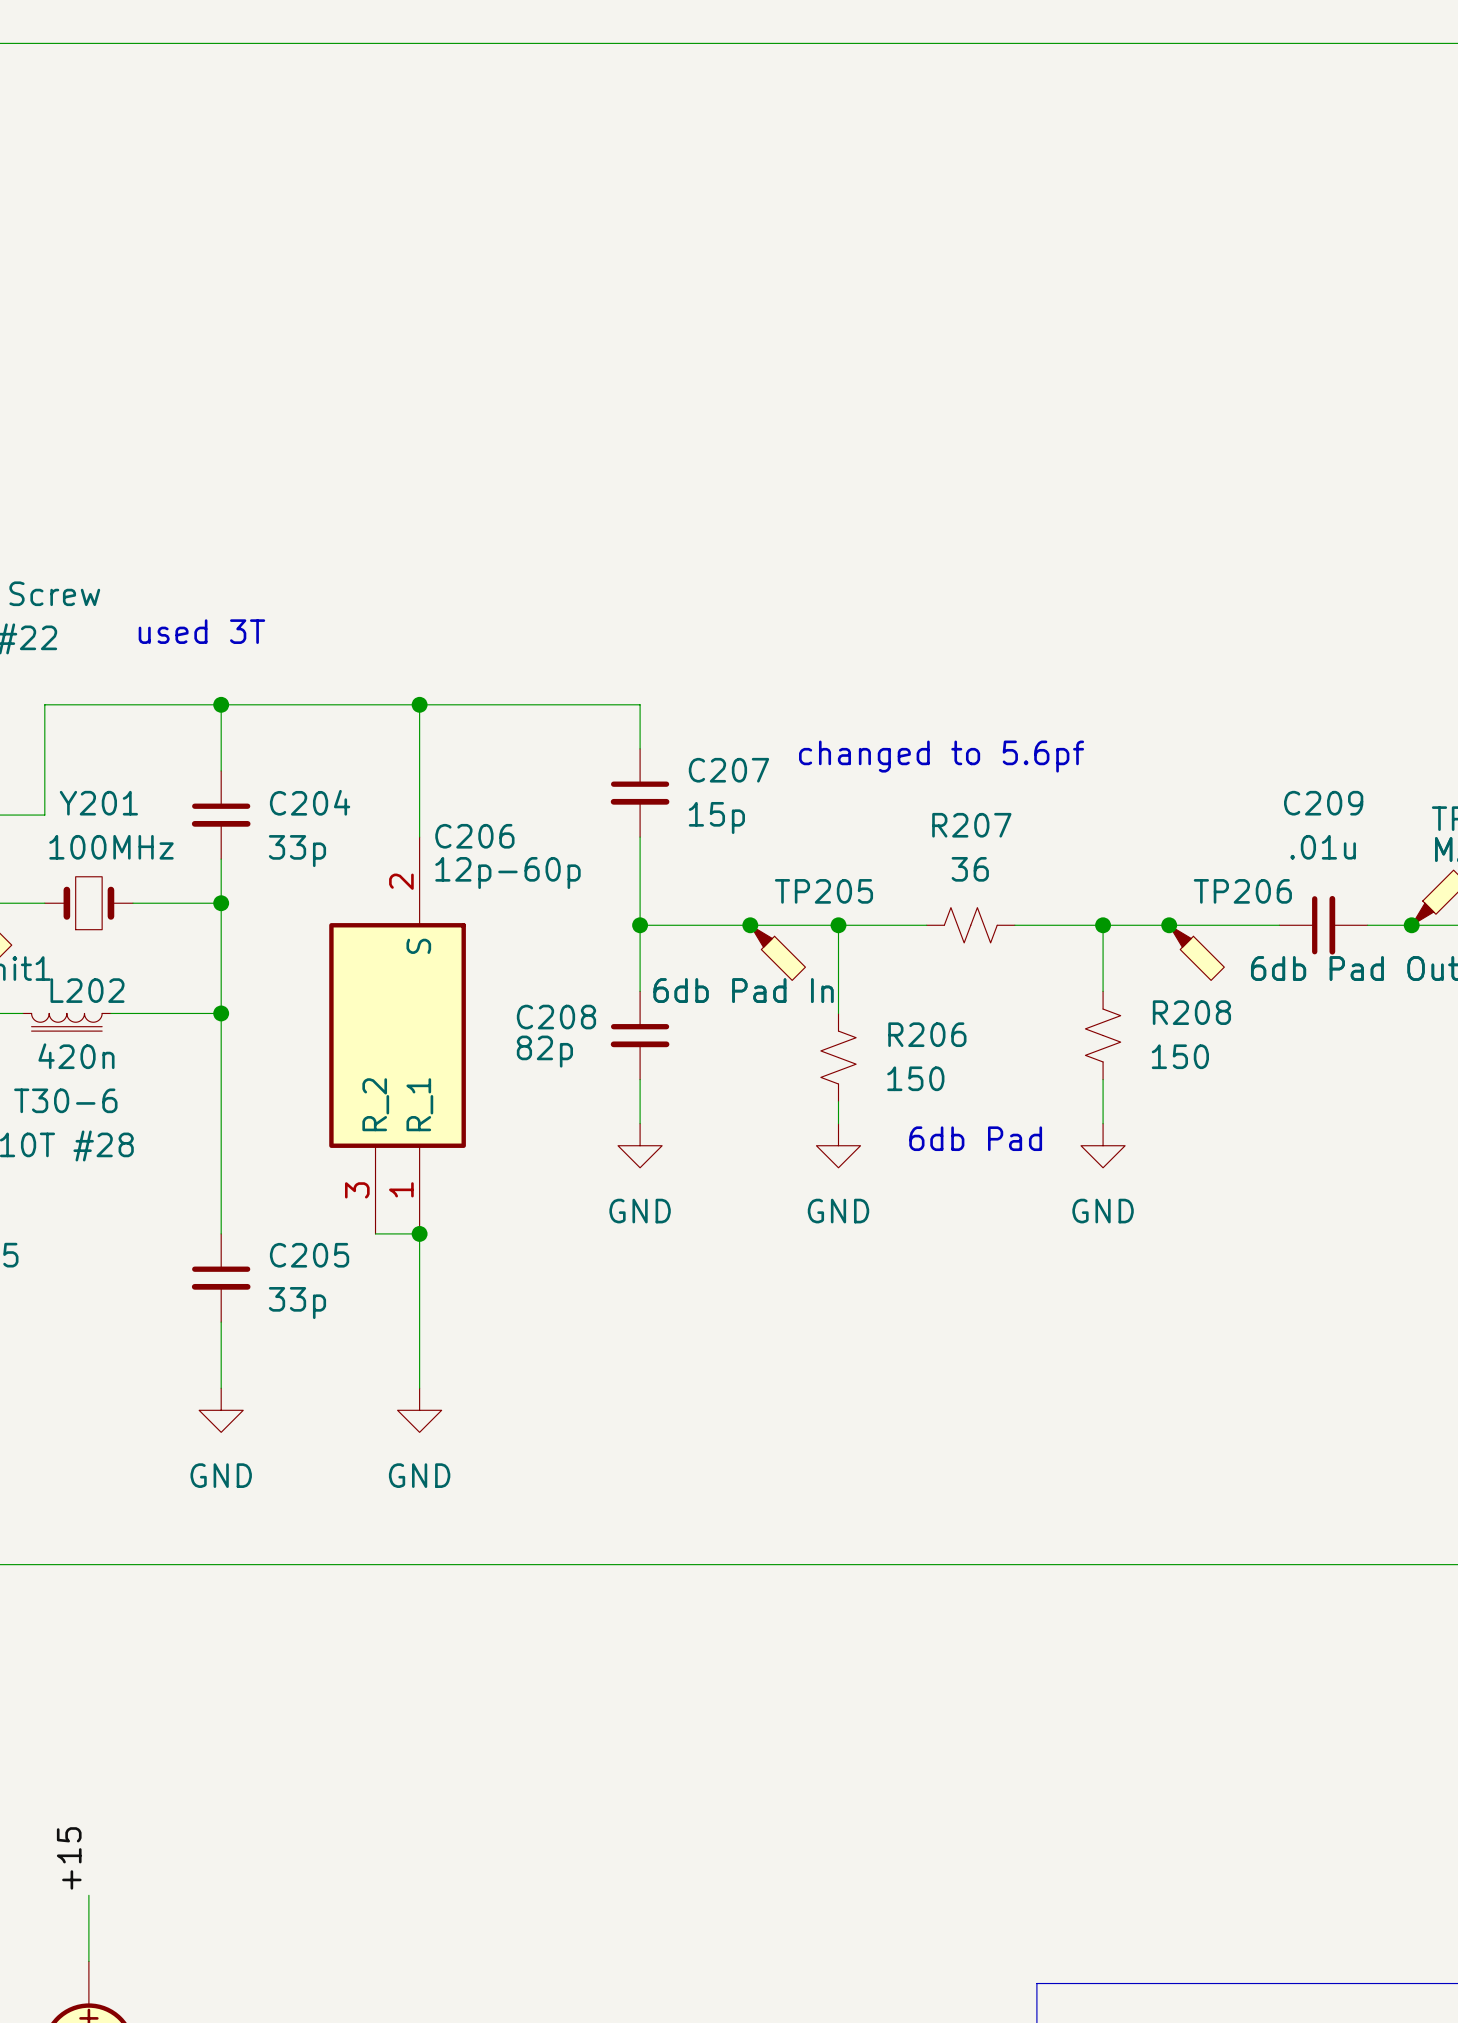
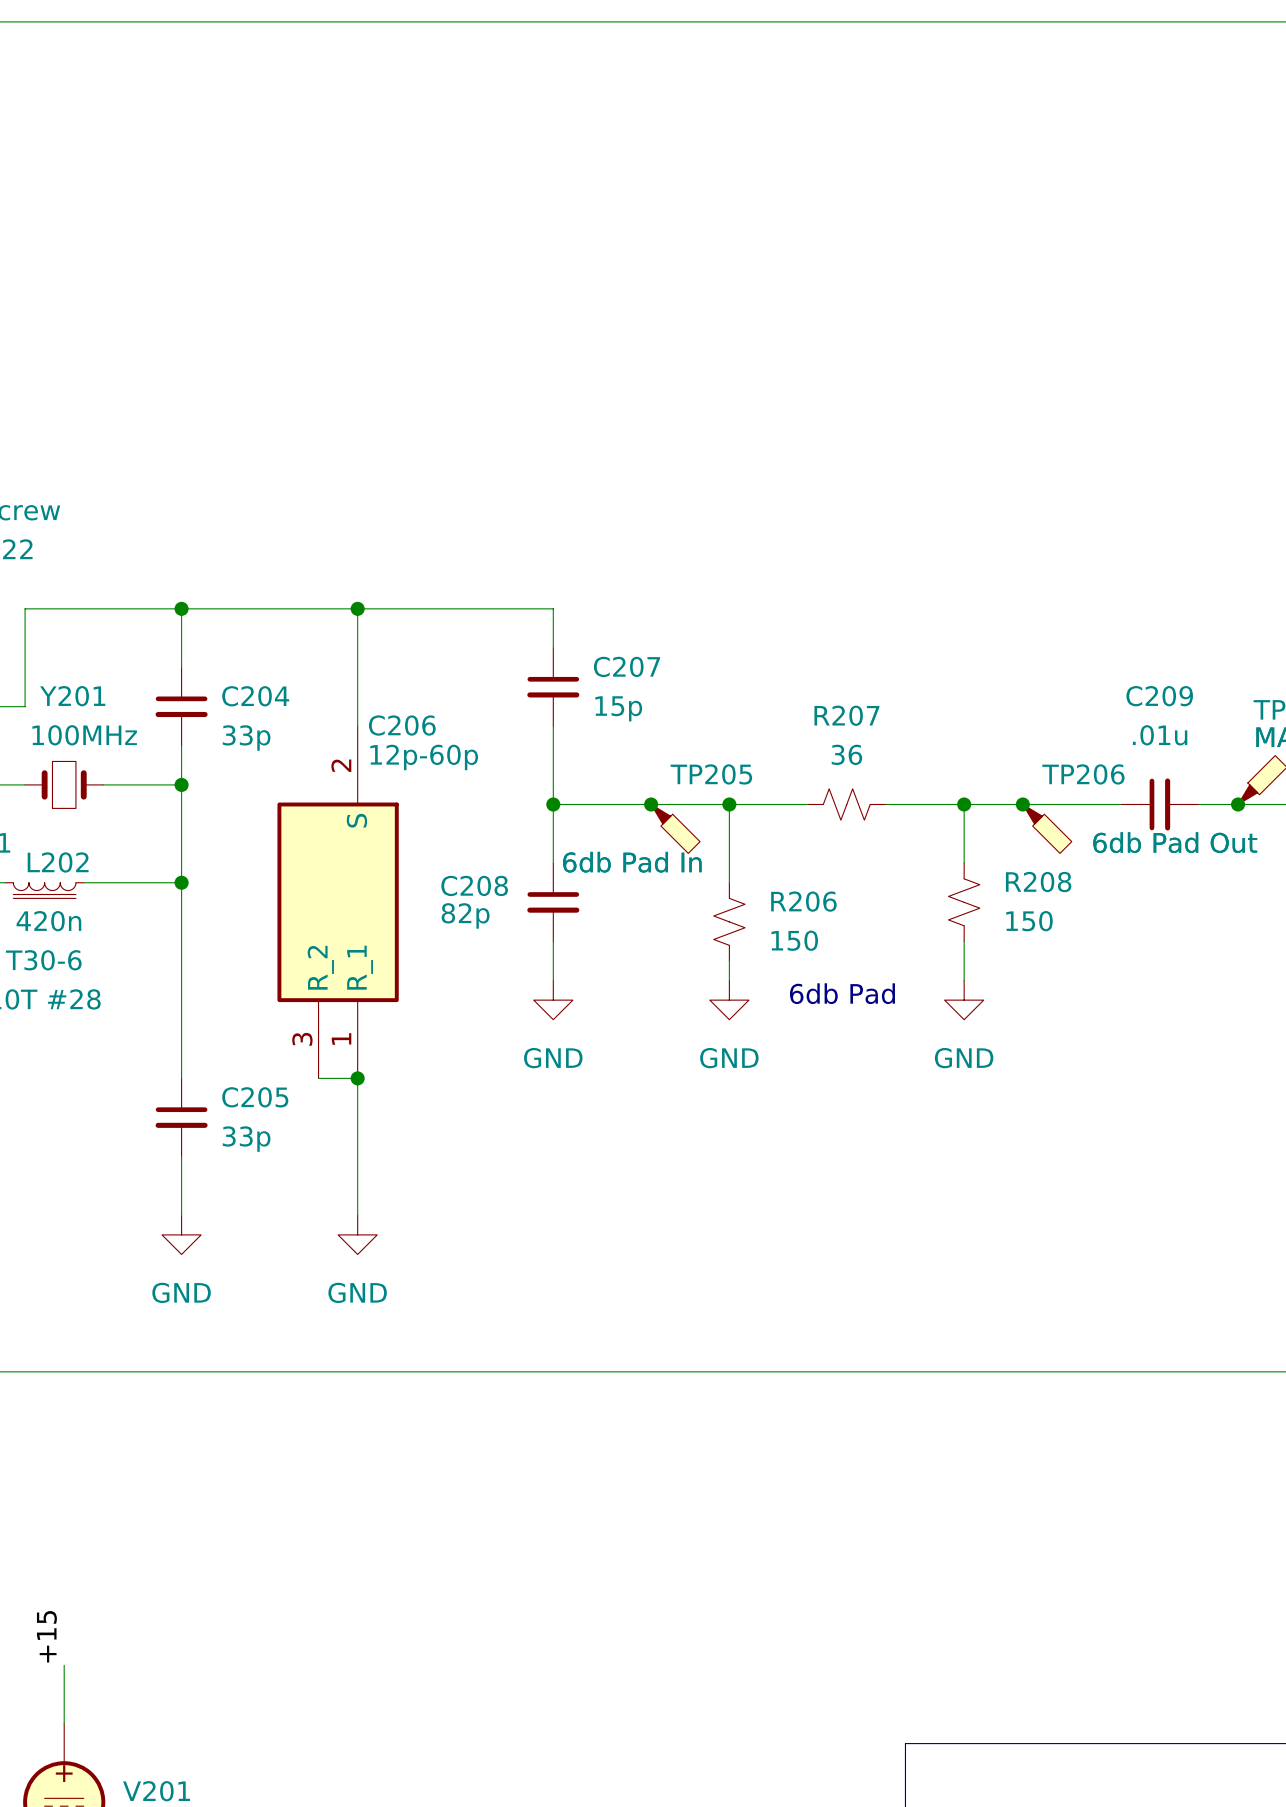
text: used 3T (201, 631) -> none
text: changed to 5.6pf (941, 756) -> none

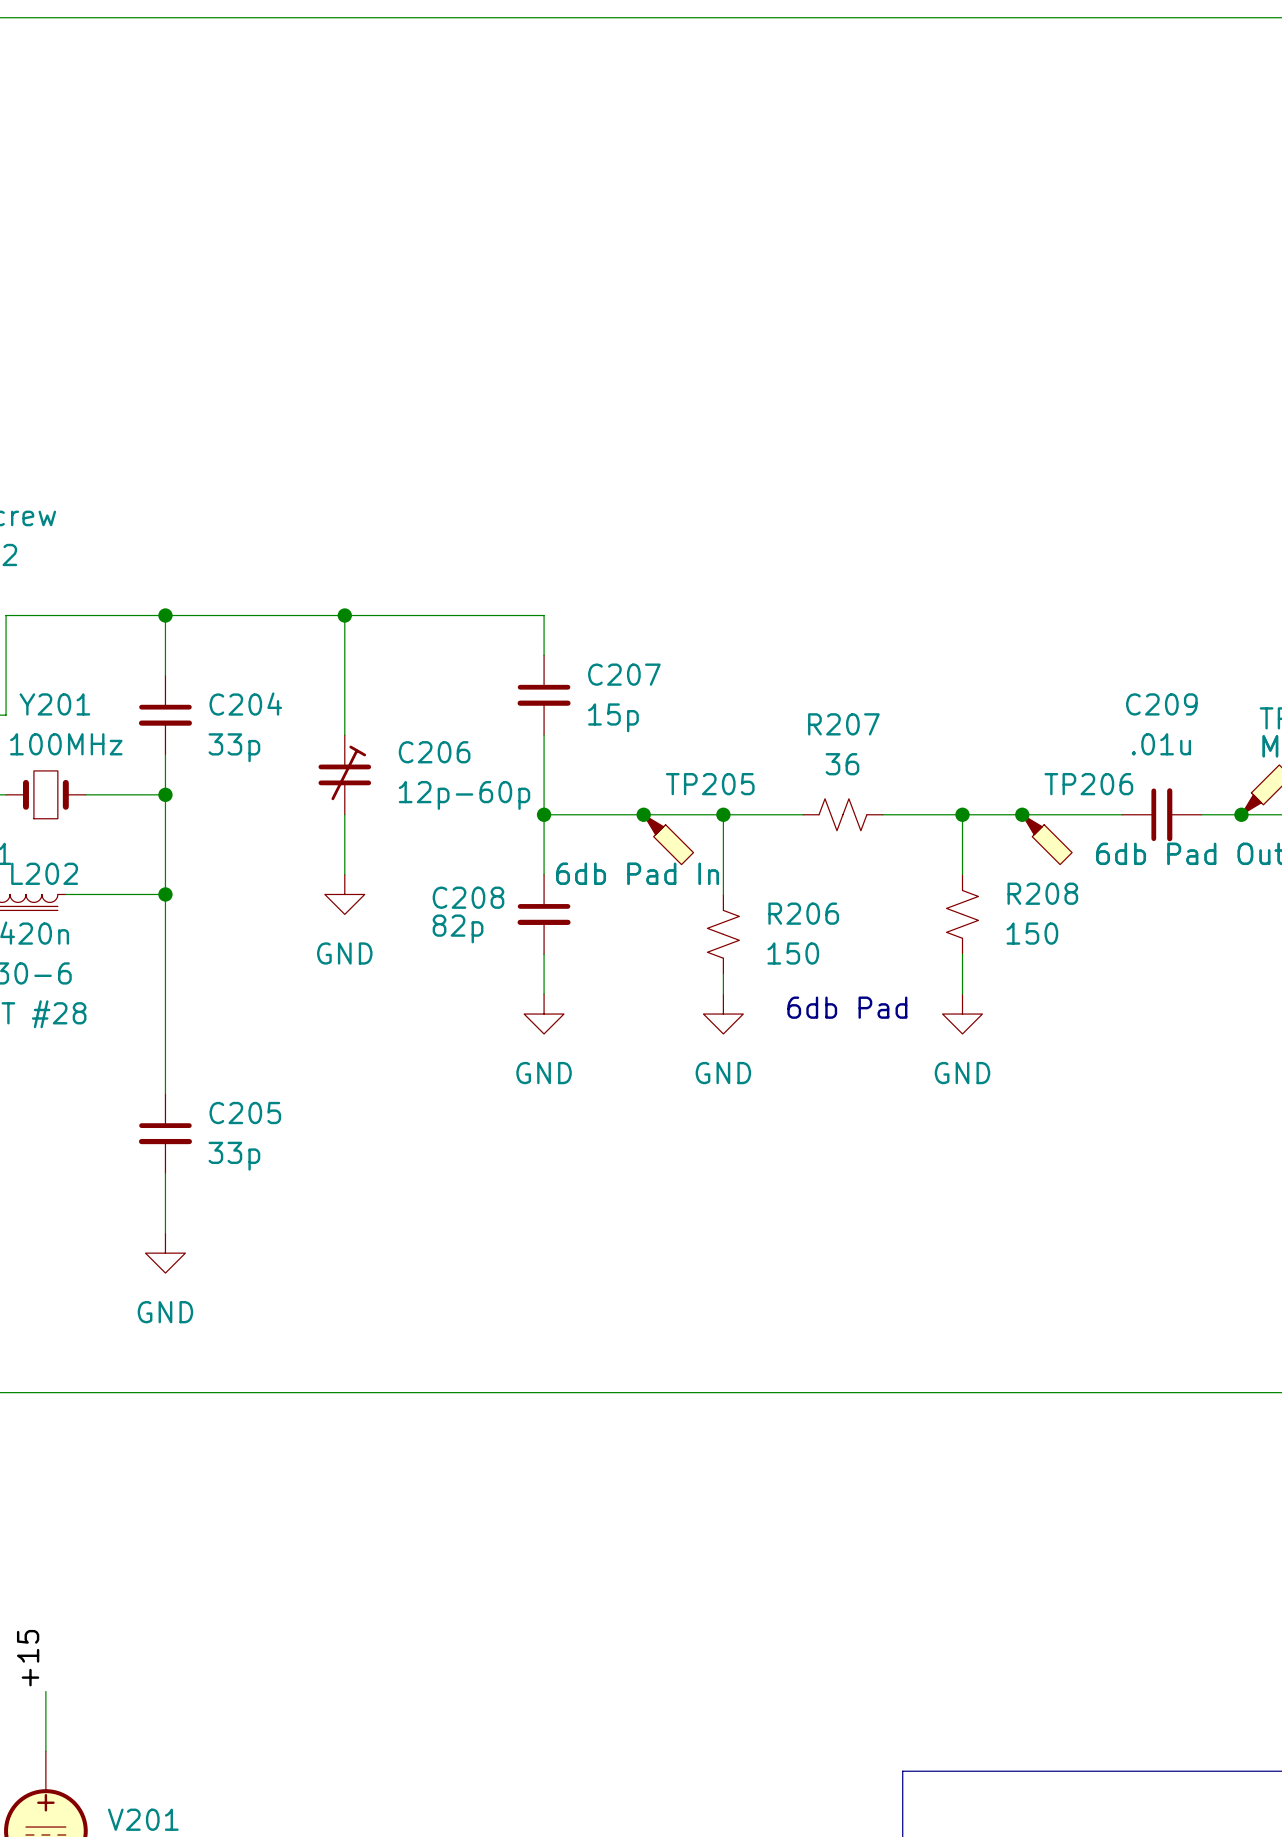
C206 name position: C206 (402, 725) -> C206 (434, 752)
C206 symbol: [277, 726, 399, 1079] -> [318, 735, 372, 815]
C206 value position: 12p-60p (424, 757) -> 12p-60p (464, 795)
wire: (318, 1078) (357, 1078) (357, 1215) -> none
junction: (357, 1078) -> none
power symbol position: GND (357, 1234) -> GND (344, 894)

